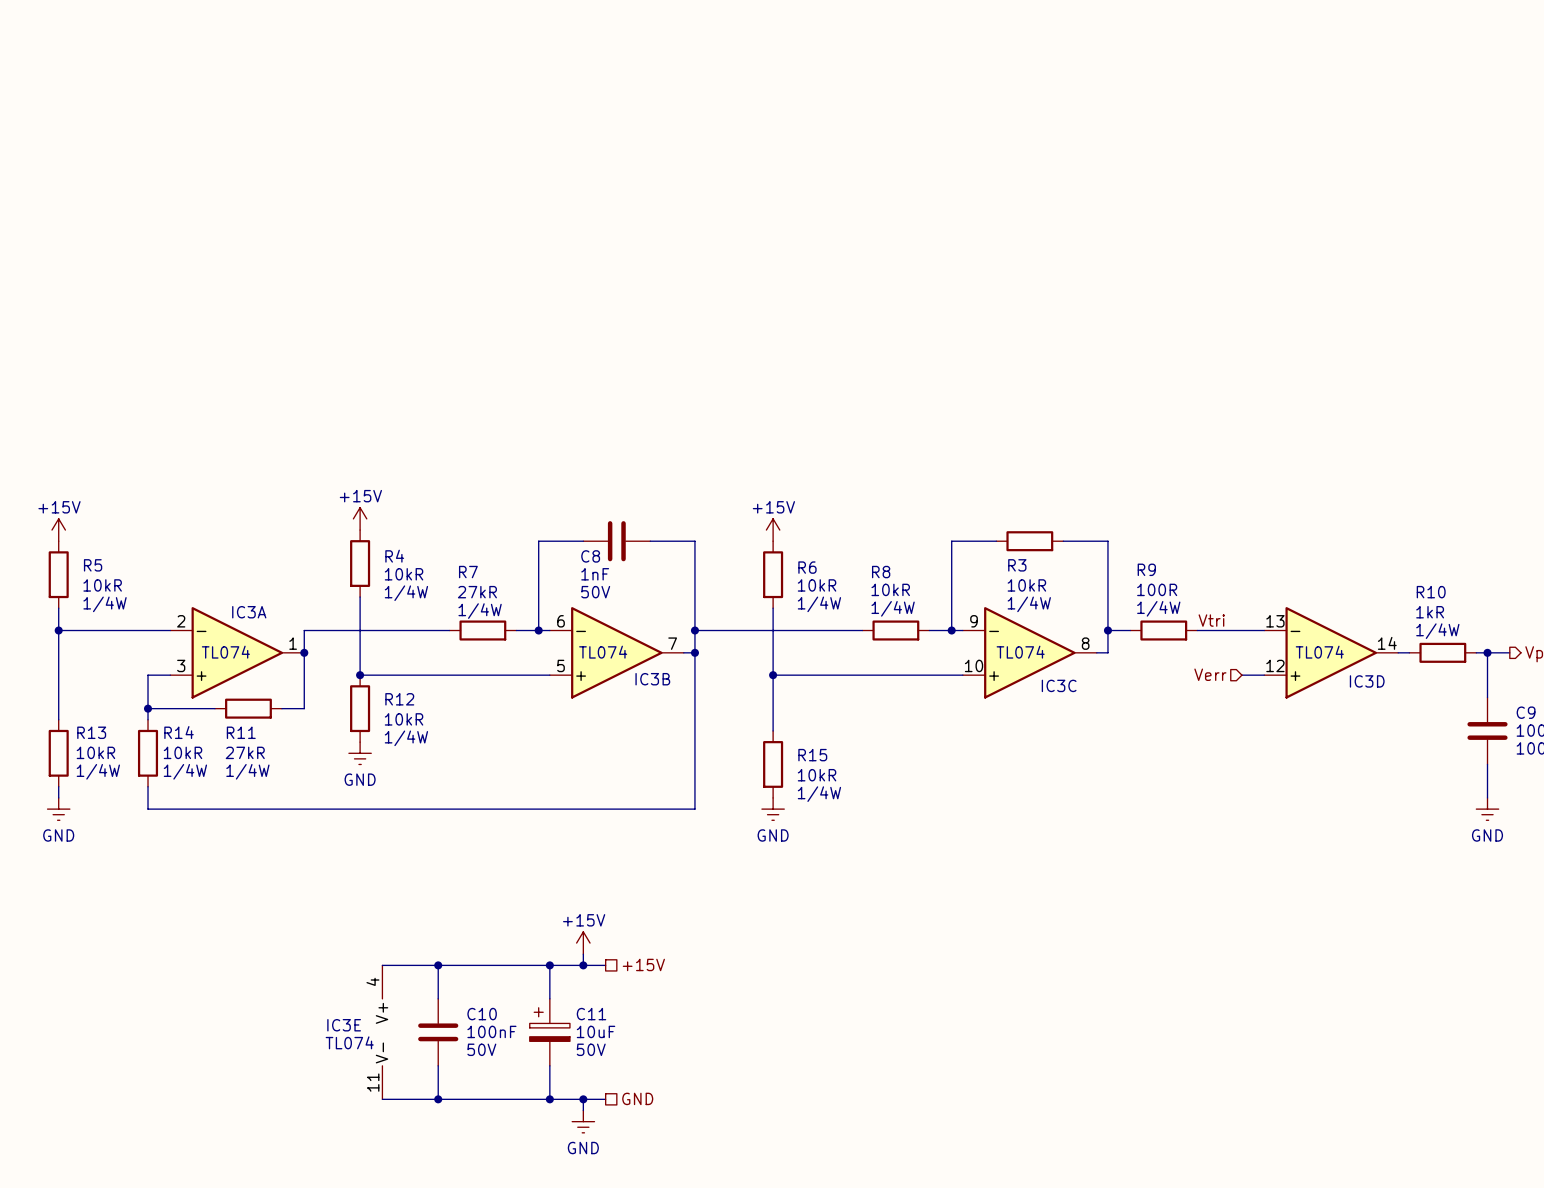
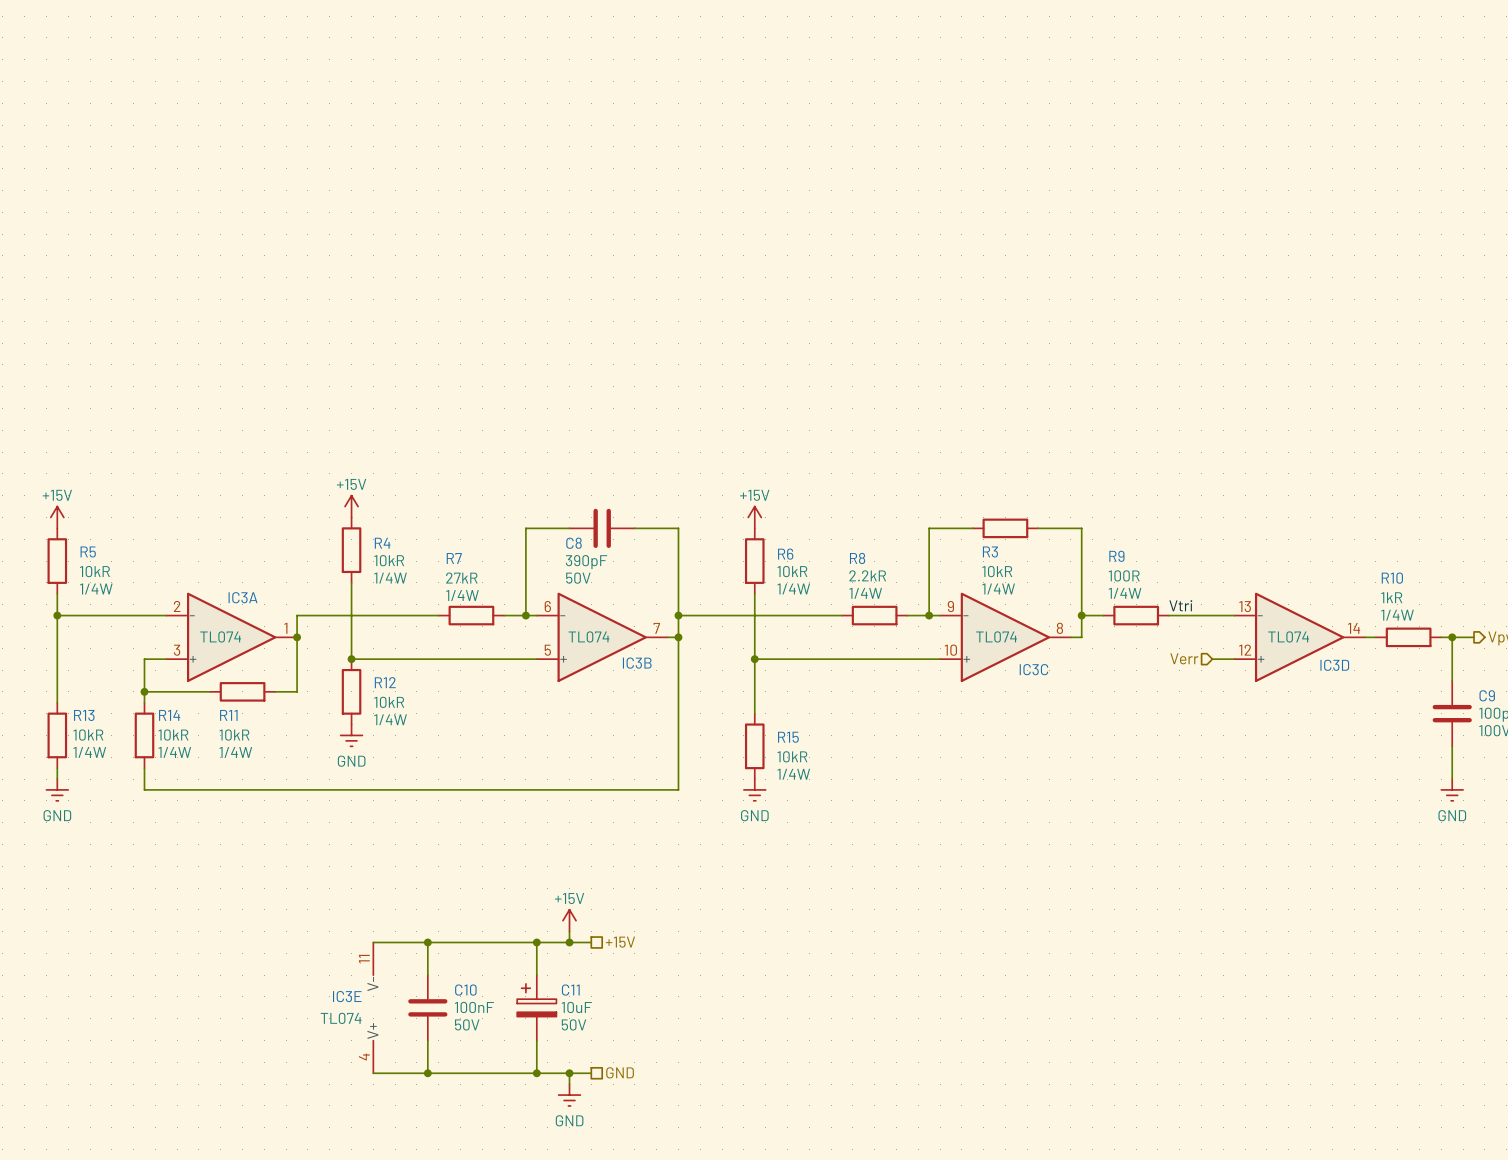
C8 value: 1nF (595, 574) -> 390pF (586, 562)
R8 value: 10kR (890, 589) -> 2.2kR (867, 575)
R11 value: 27kR (245, 752) -> 10kR (234, 735)
IC3E rotation: 0° (382, 1032) -> 180° (373, 1007)

